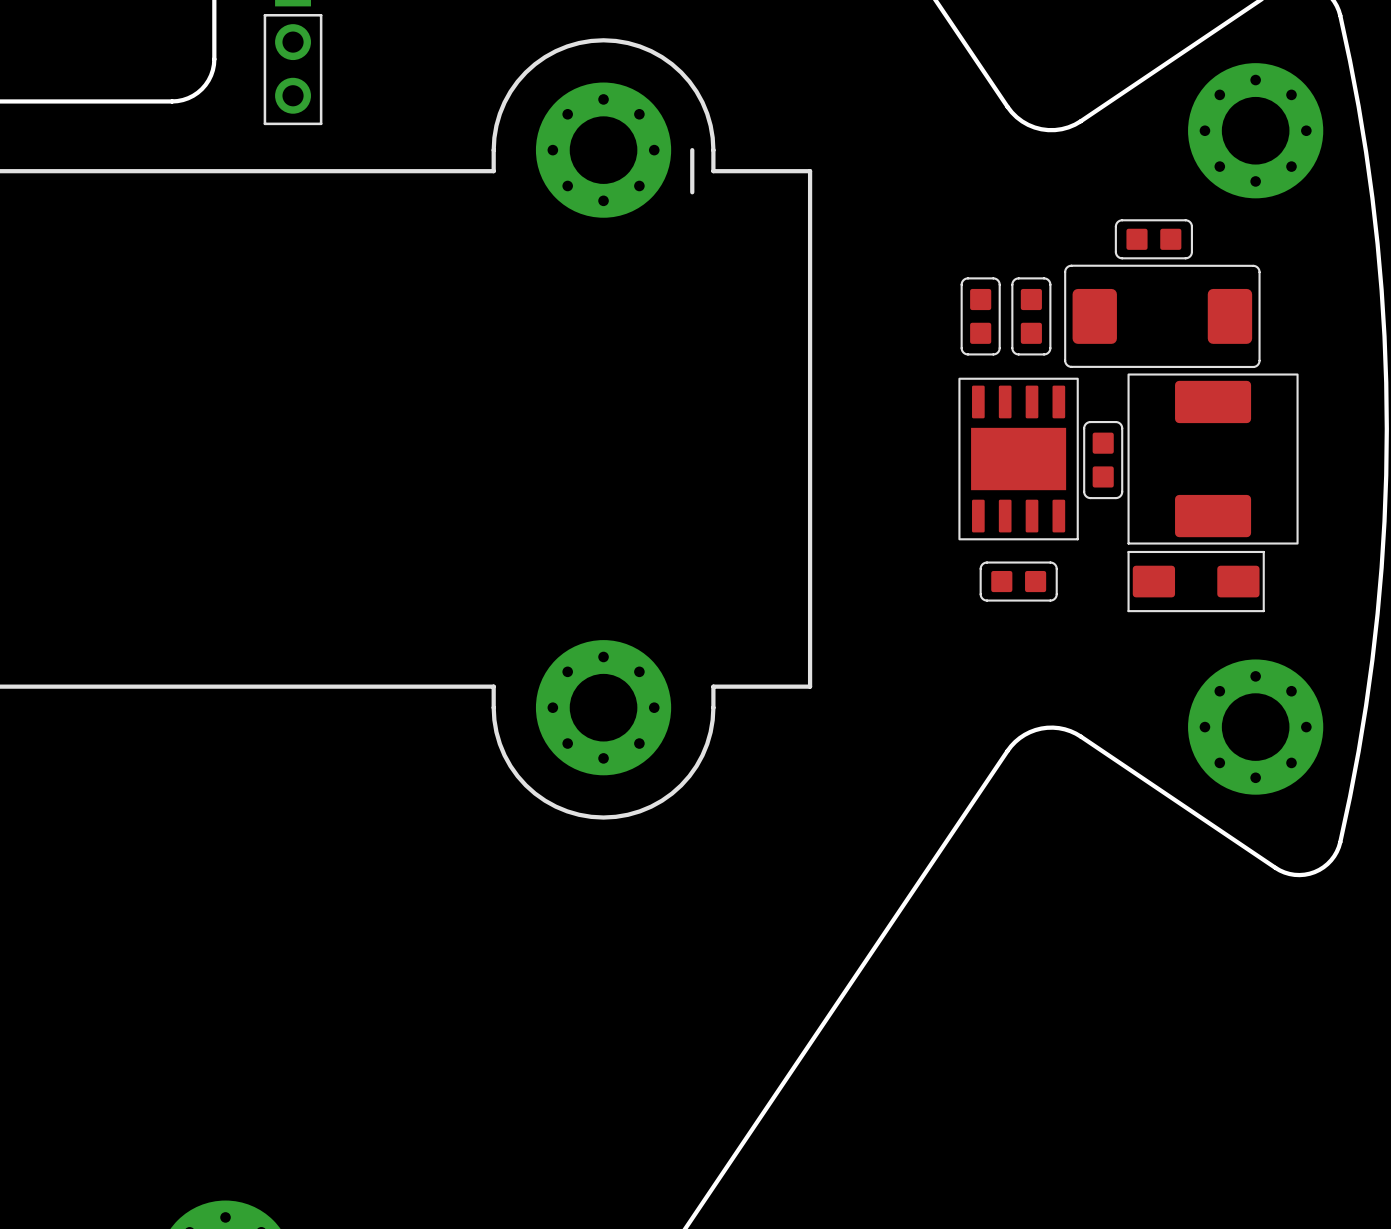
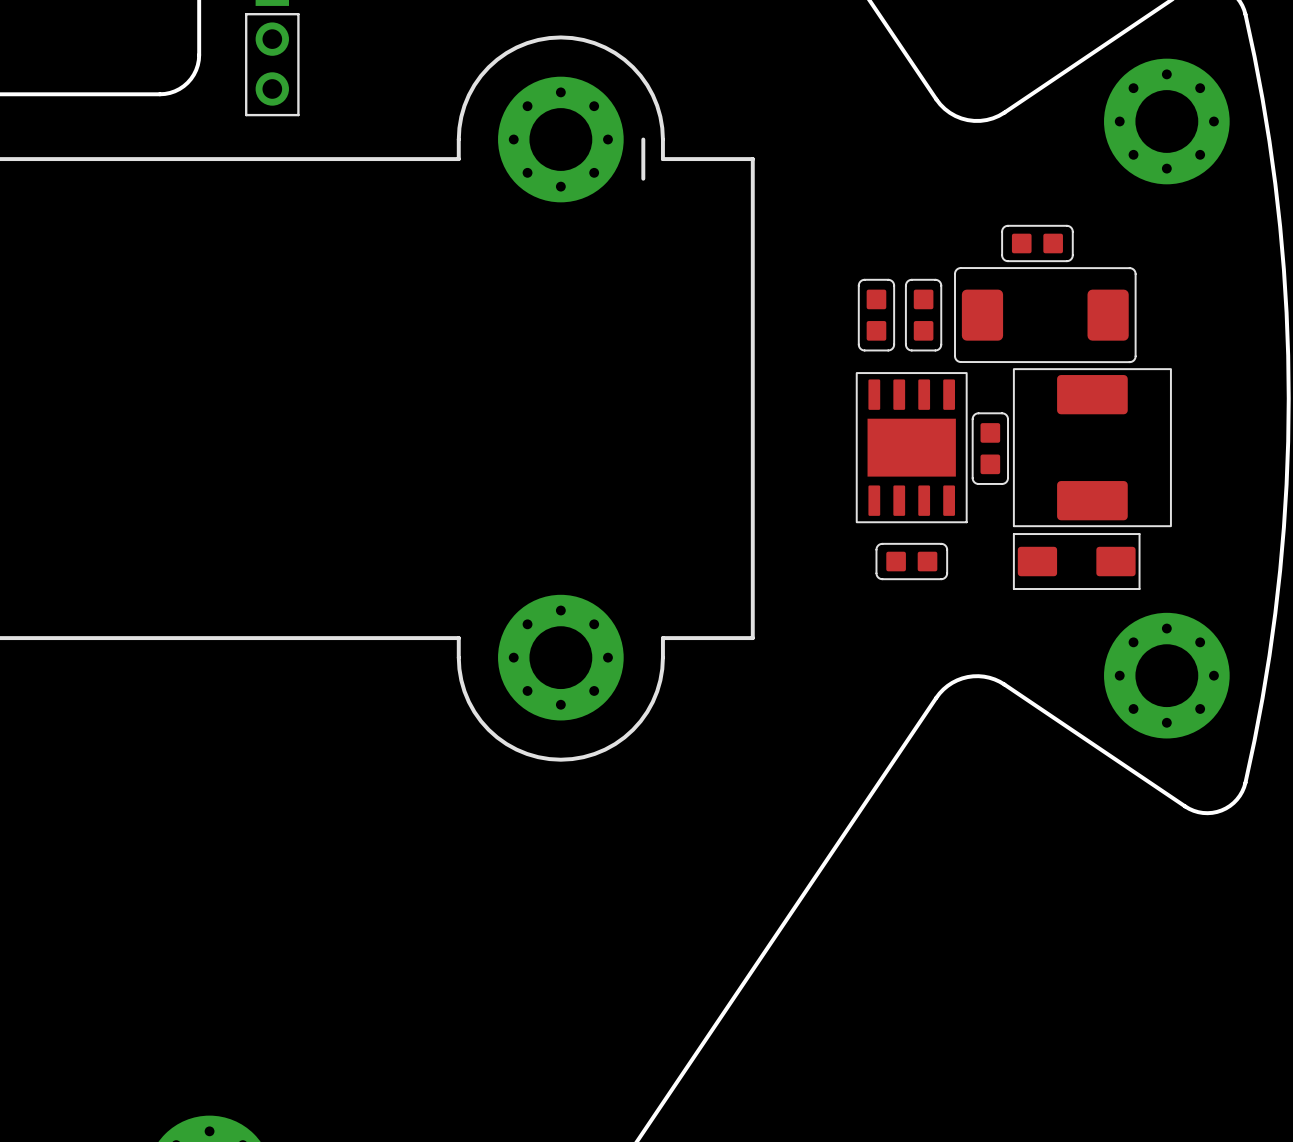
part position: (1153, 239) -> (1037, 243)
part: (980, 316) -> none
part: (1031, 316) -> none
part: (1162, 316) -> none
part: none -> (876, 315)
part: none -> (923, 315)
part: none -> (1045, 315)
part position: (1018, 459) -> (911, 447)
part position: (1213, 459) -> (1092, 447)
part position: (1103, 460) -> (990, 448)
part position: (1018, 581) -> (911, 561)
part position: (1196, 581) -> (1076, 561)

